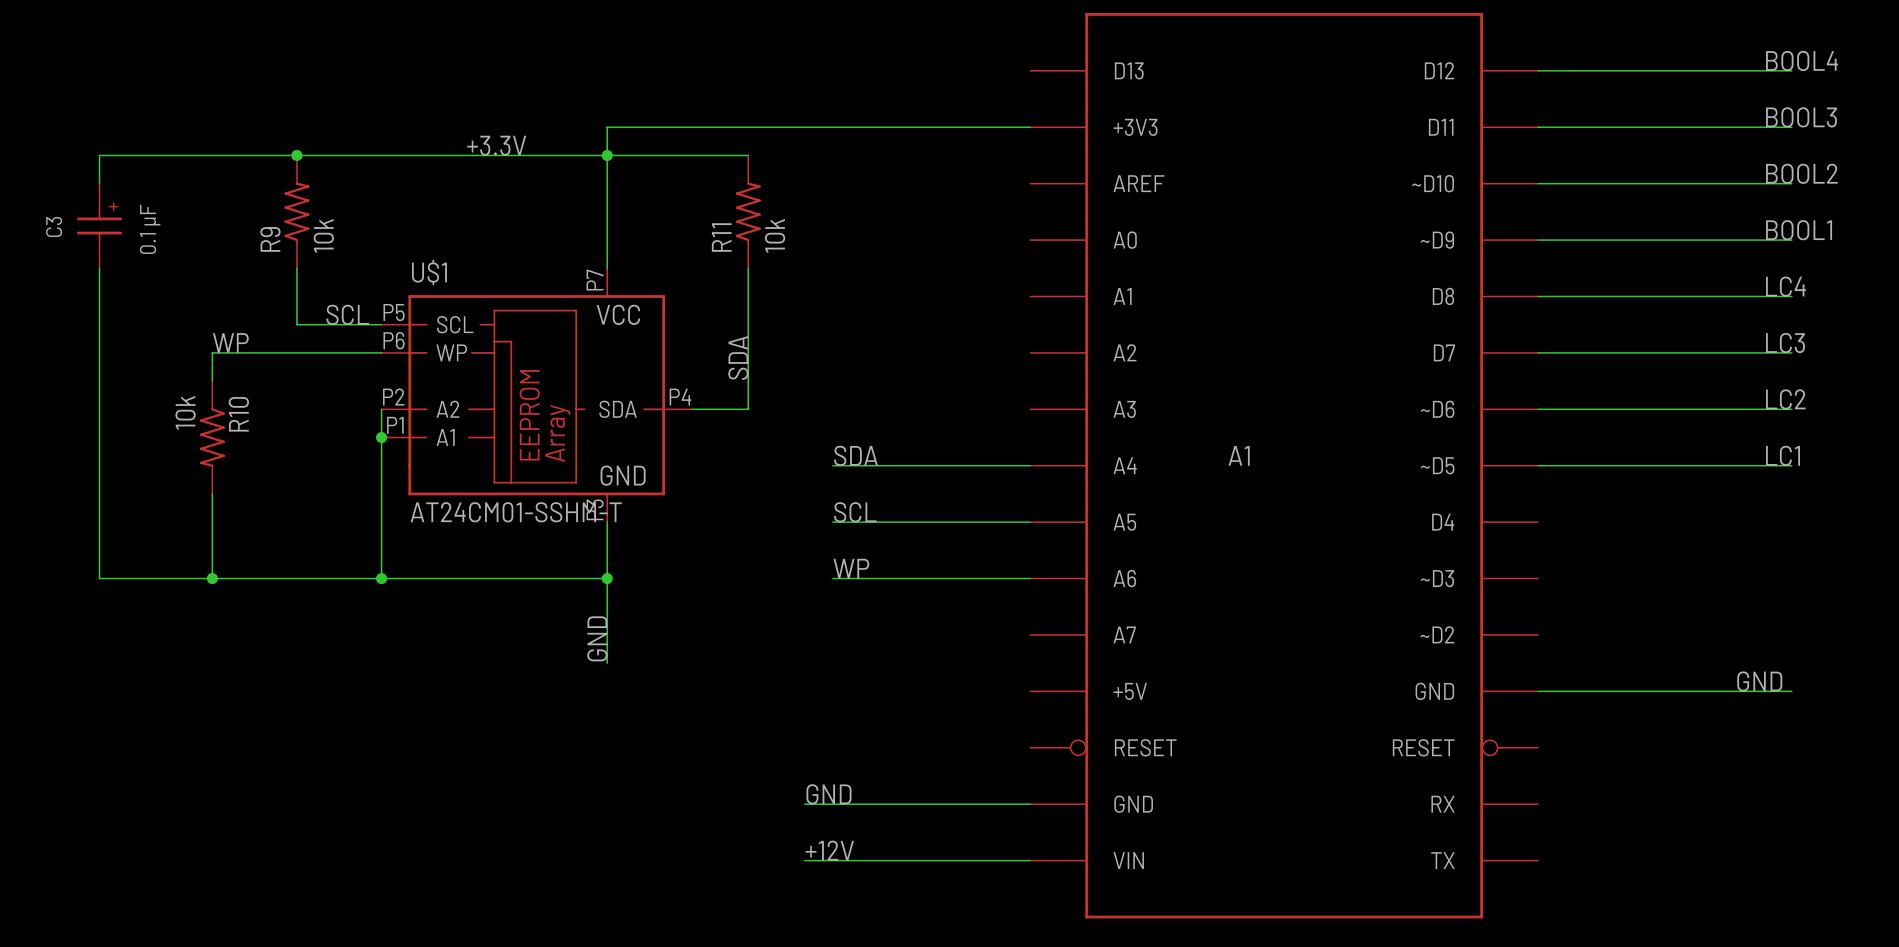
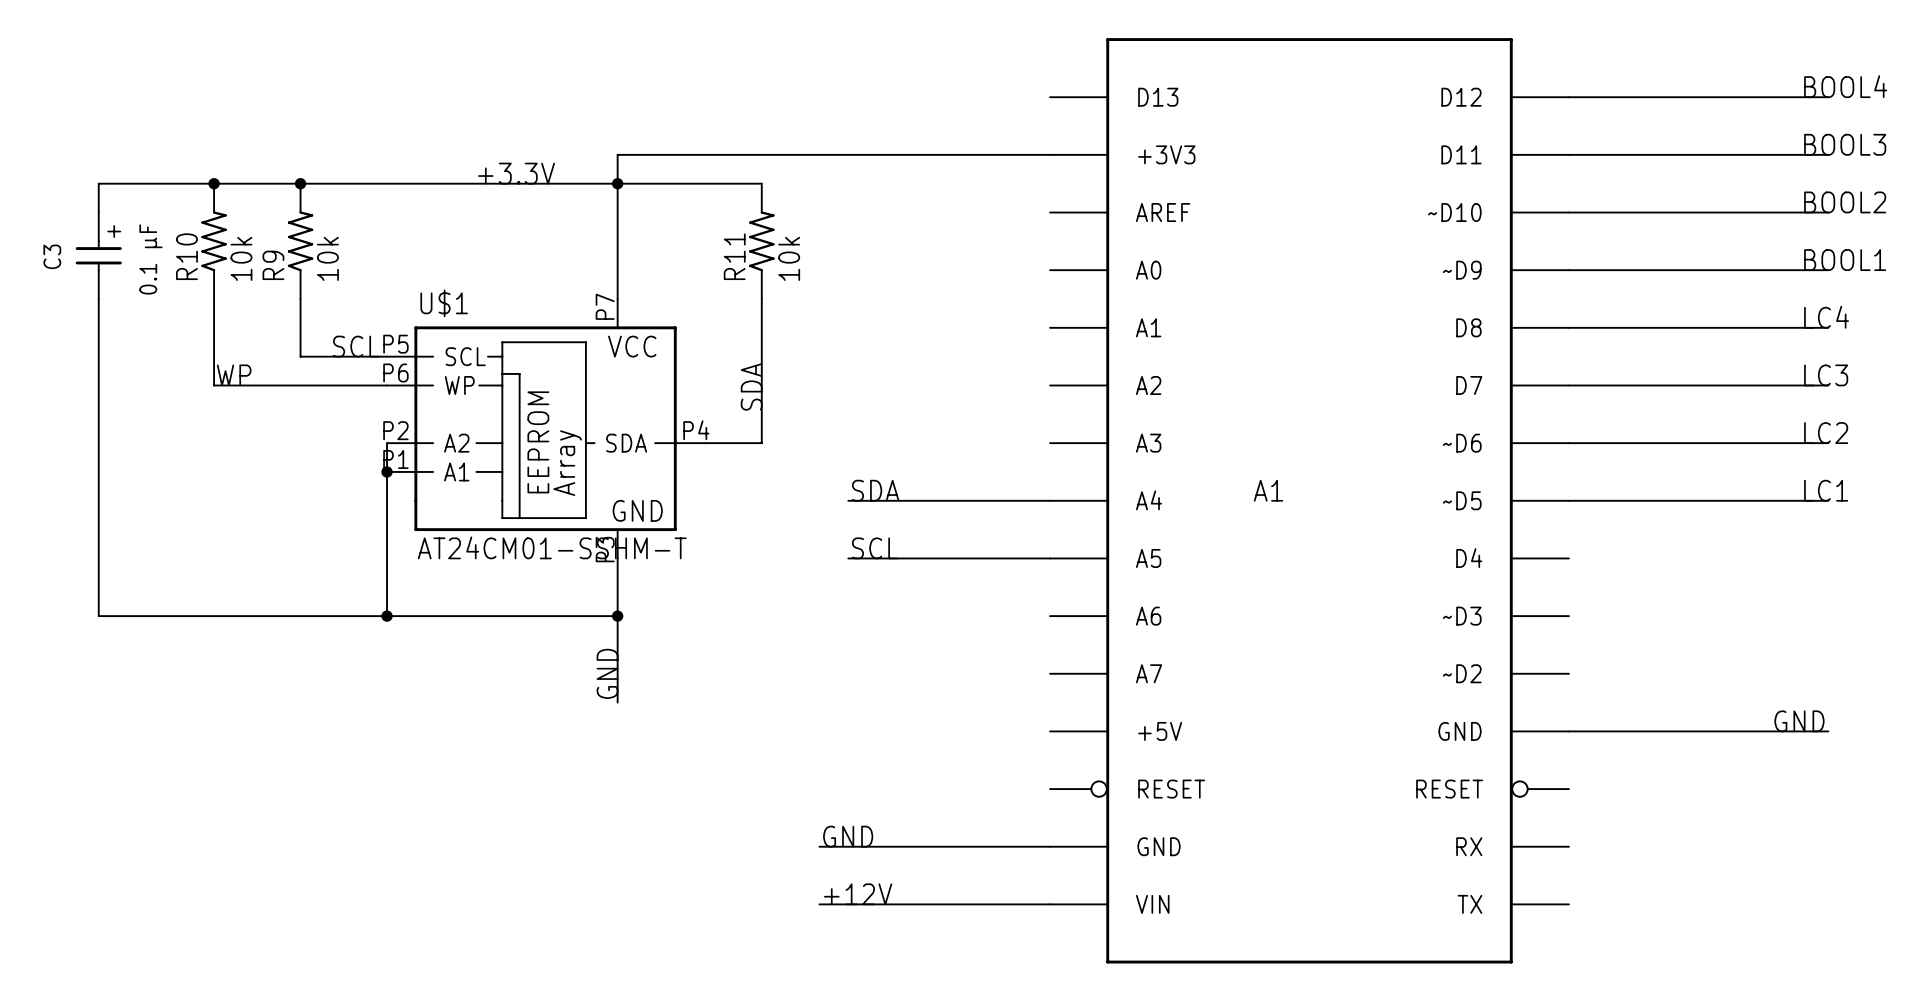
junction: none -> (214, 183)
wire: (212, 352) (212, 381) -> (214, 385) (214, 299)
R10 rotation: 0° (212, 437) -> 180° (214, 241)
R10 position: (212, 437) -> (214, 241)
wire: (212, 493) (212, 578) -> none
label: WP (851, 568) -> none
junction: (212, 578) -> none
wire: (832, 578) (1030, 578) -> none

